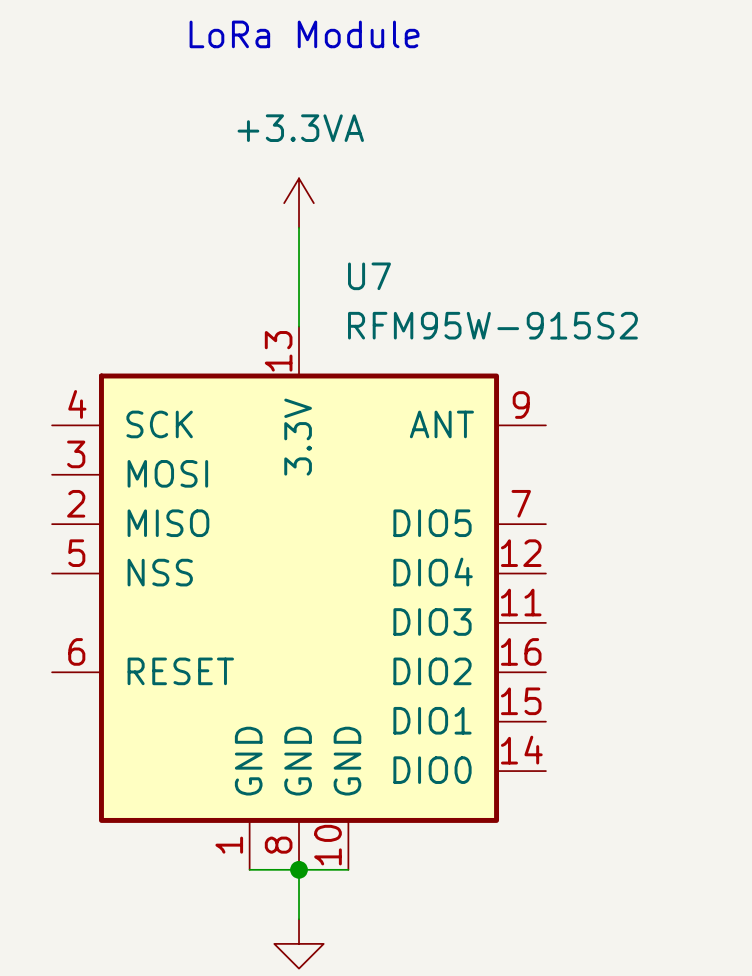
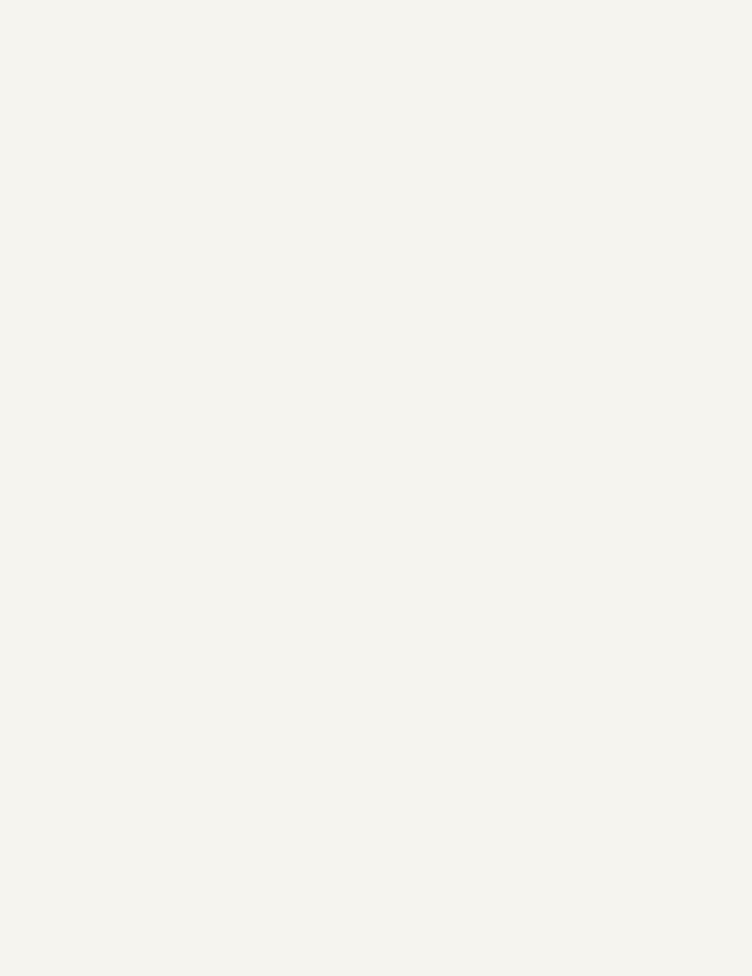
text: LoRa Module (304, 34) -> none
power symbol: +3.3VA (299, 203) -> none
wire: (299, 227) (299, 326) -> none
U7: RFM95W-915S2 (299, 598) -> none
wire: (249, 869) (348, 869) -> none
wire: (299, 869) (299, 919) -> none
junction: (299, 869) -> none
power symbol: (299, 943) -> none

